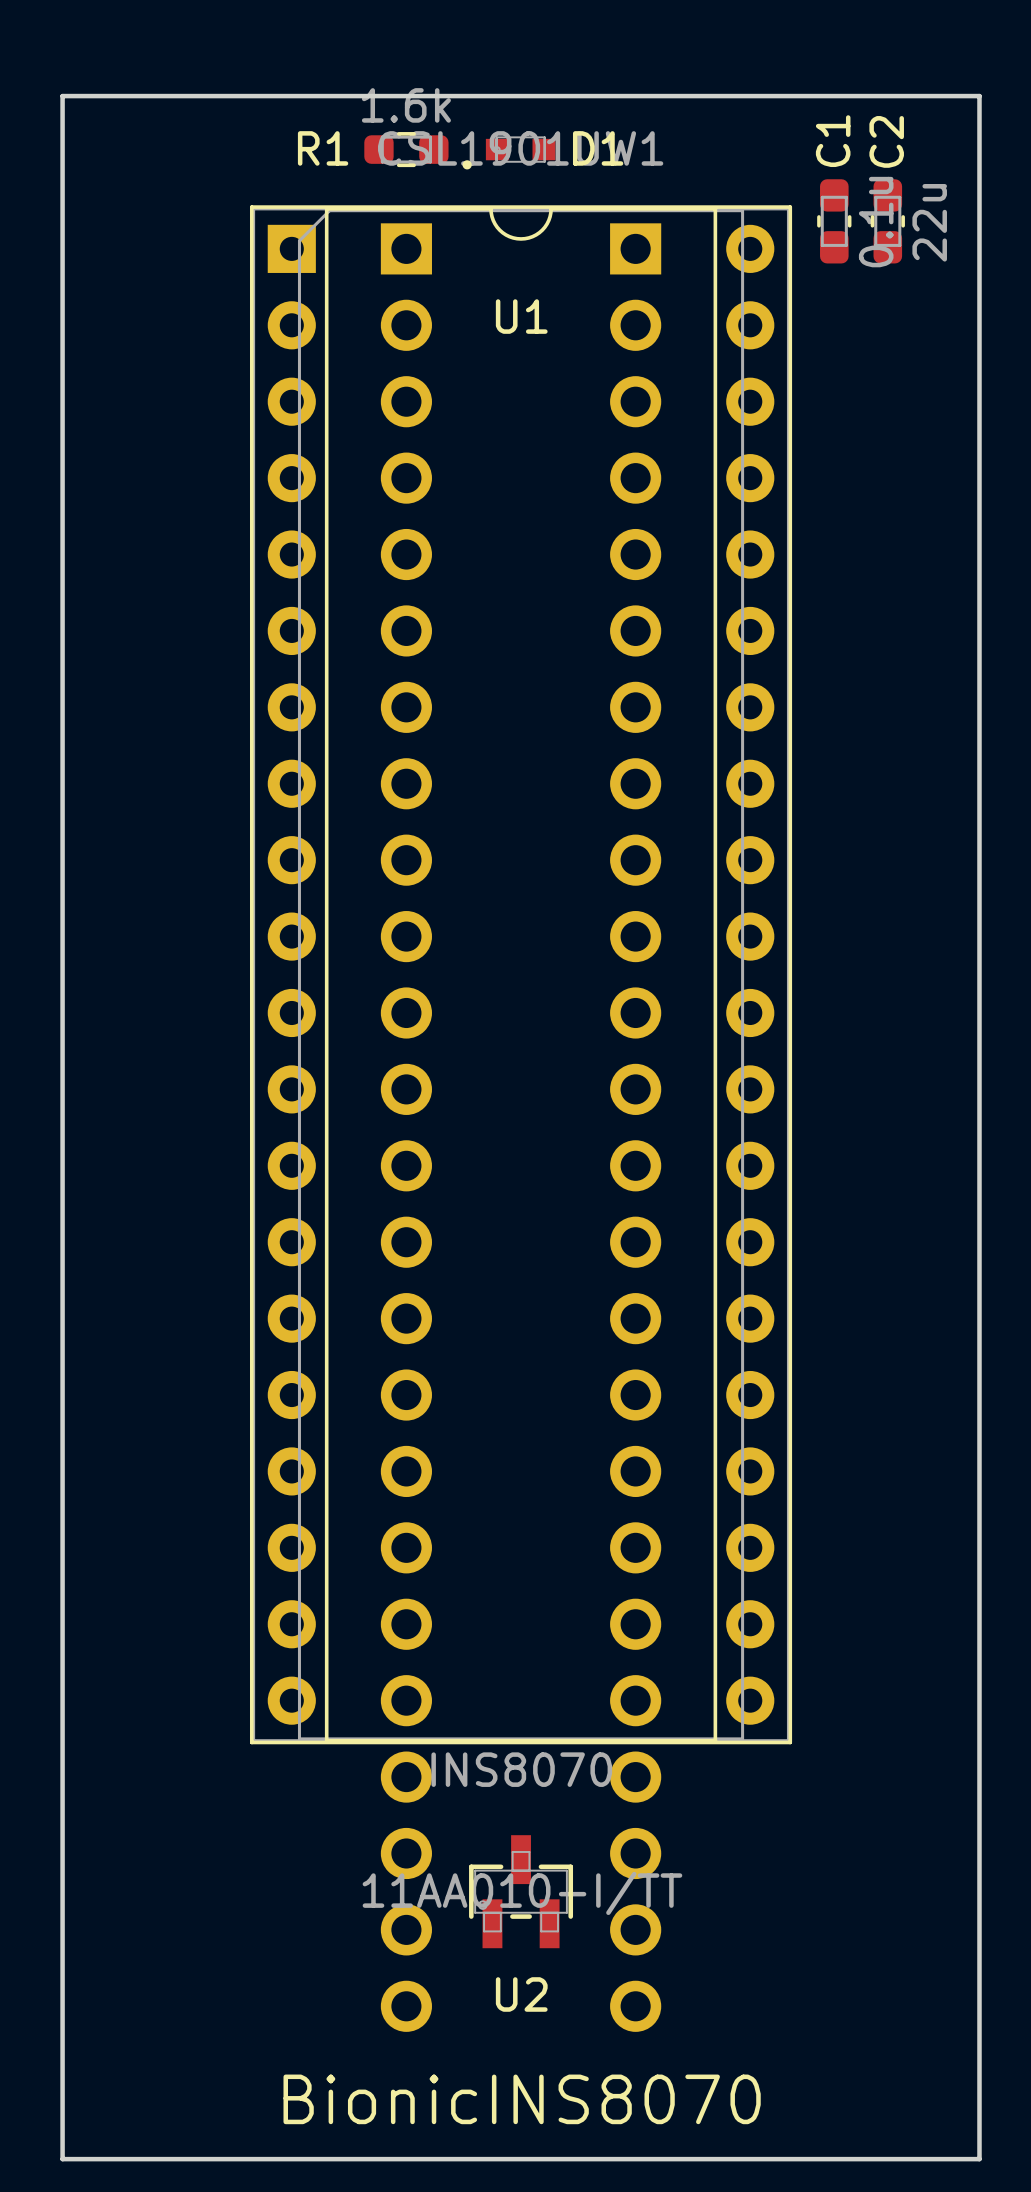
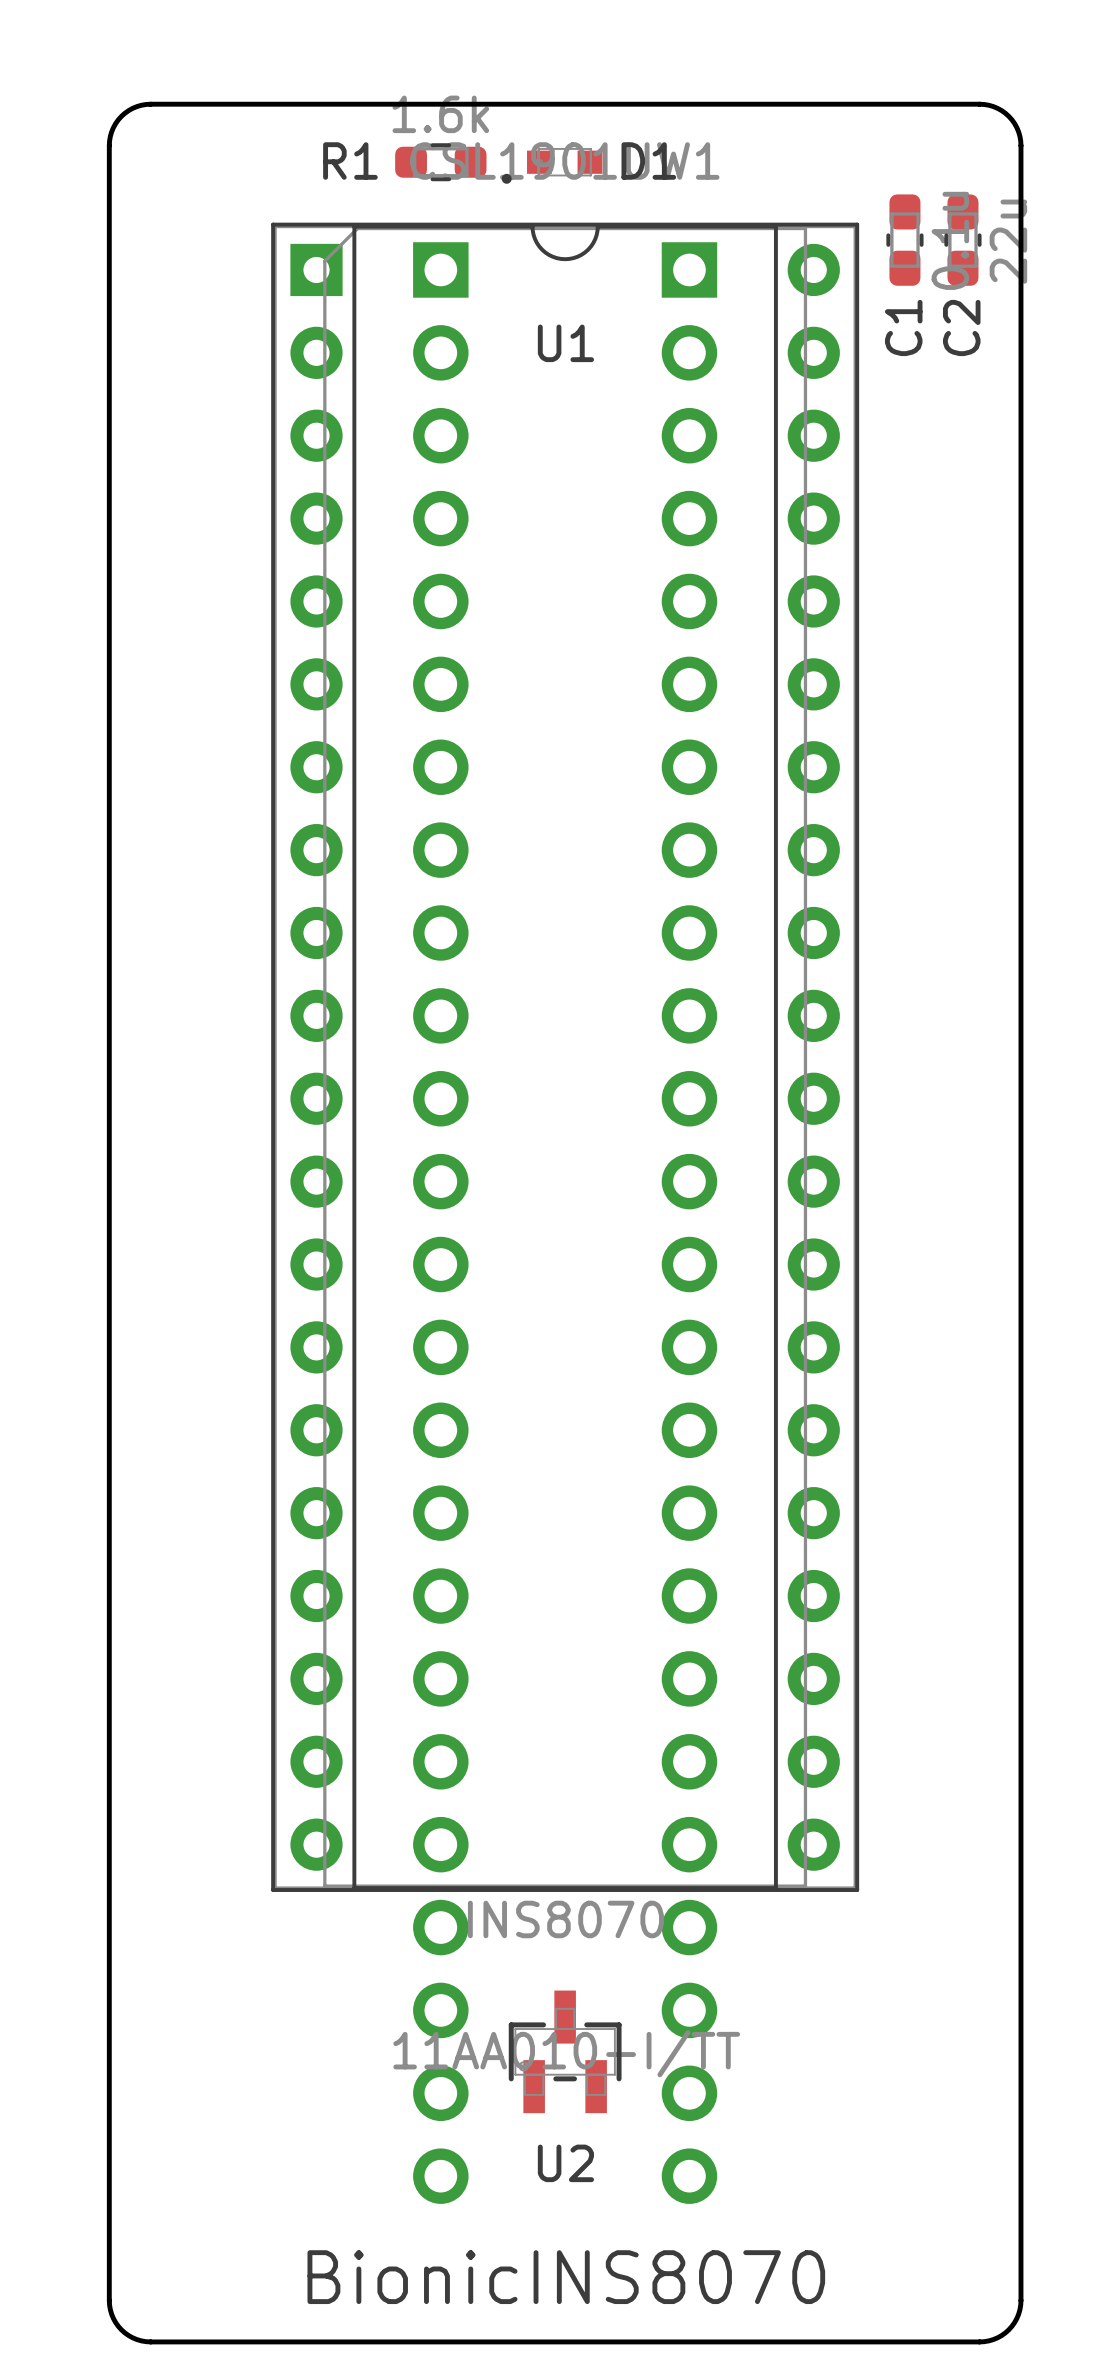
board edge: (138, 96) (62, 96) (62, 2159) (138, 2159) -> (150, 104) (137, 106) (121, 116) (111, 131) (109, 145) (109, 2300) (111, 2314) (121, 2329) (137, 2339) (150, 2341)
board edge: (903, 96) (979, 96) (979, 2159) (903, 2159) -> (979, 104) (993, 106) (1008, 116) (1018, 131) (1020, 145) (1020, 2300) (1018, 2314) (1008, 2329) (993, 2339) (979, 2341)
C1 name position: C1 (833, 141) -> C1 (903, 327)
C2 name position: C2 (886, 141) -> C2 (961, 327)

